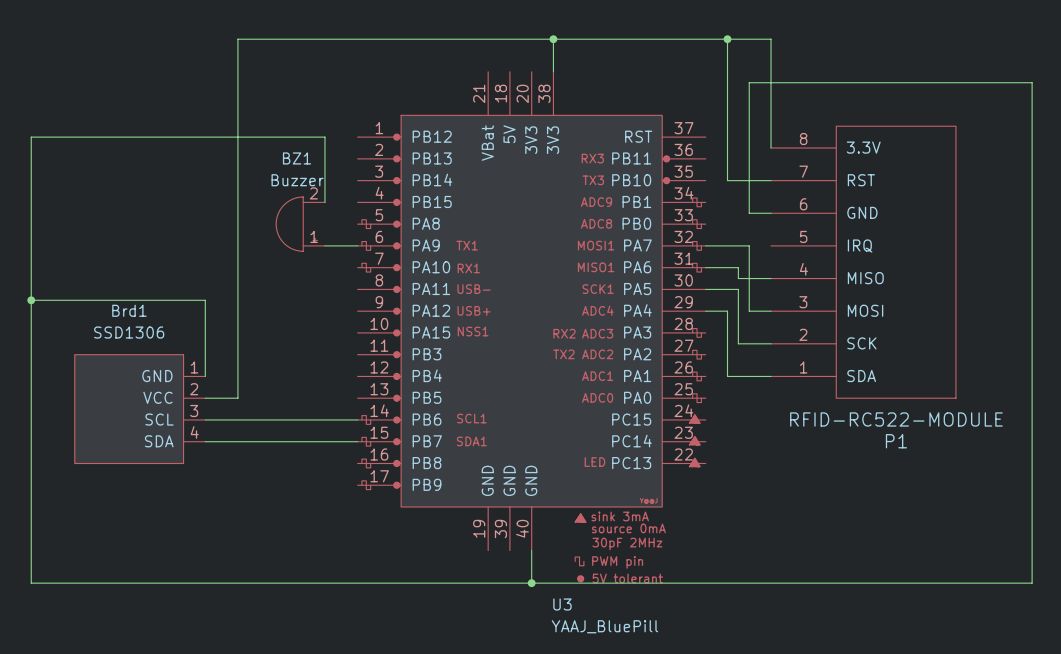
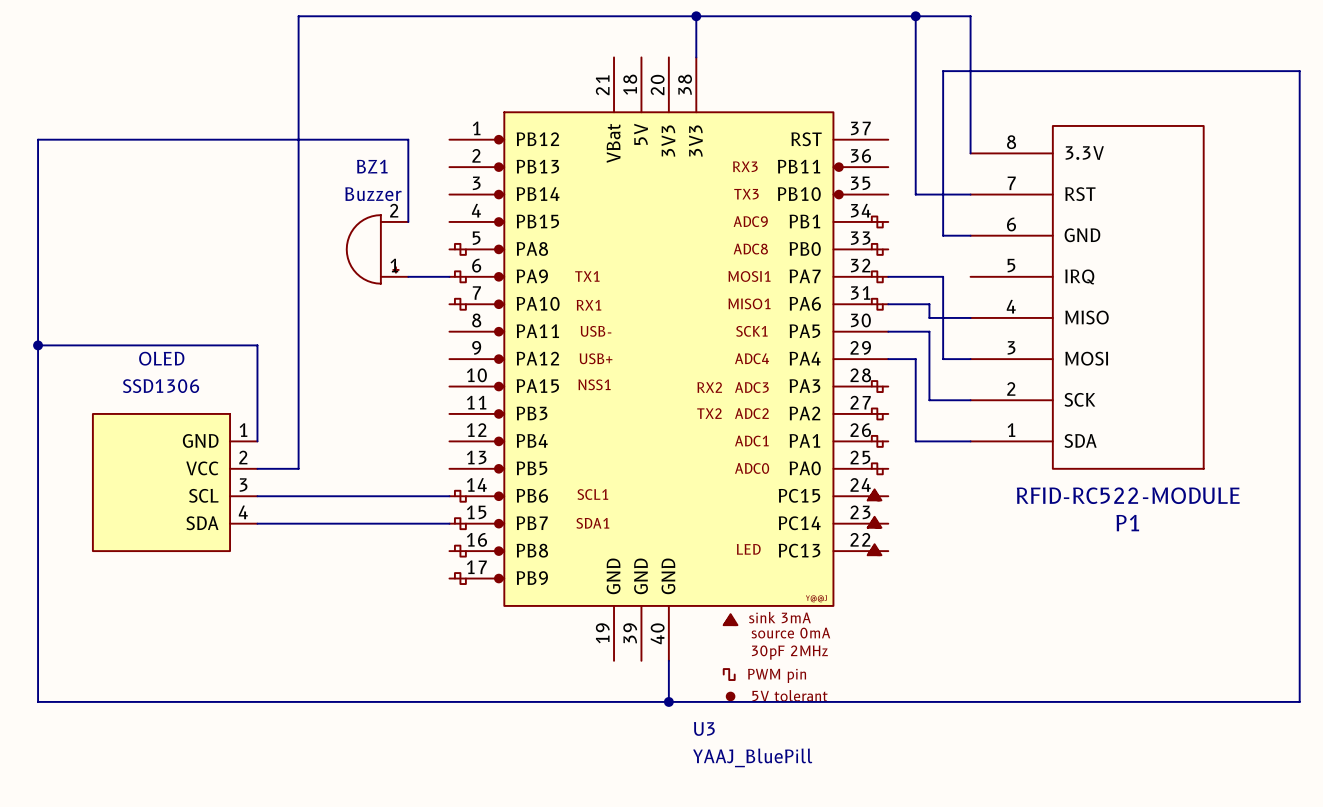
Brd1 name: Brd1 (129, 310) -> OLED (161, 358)

